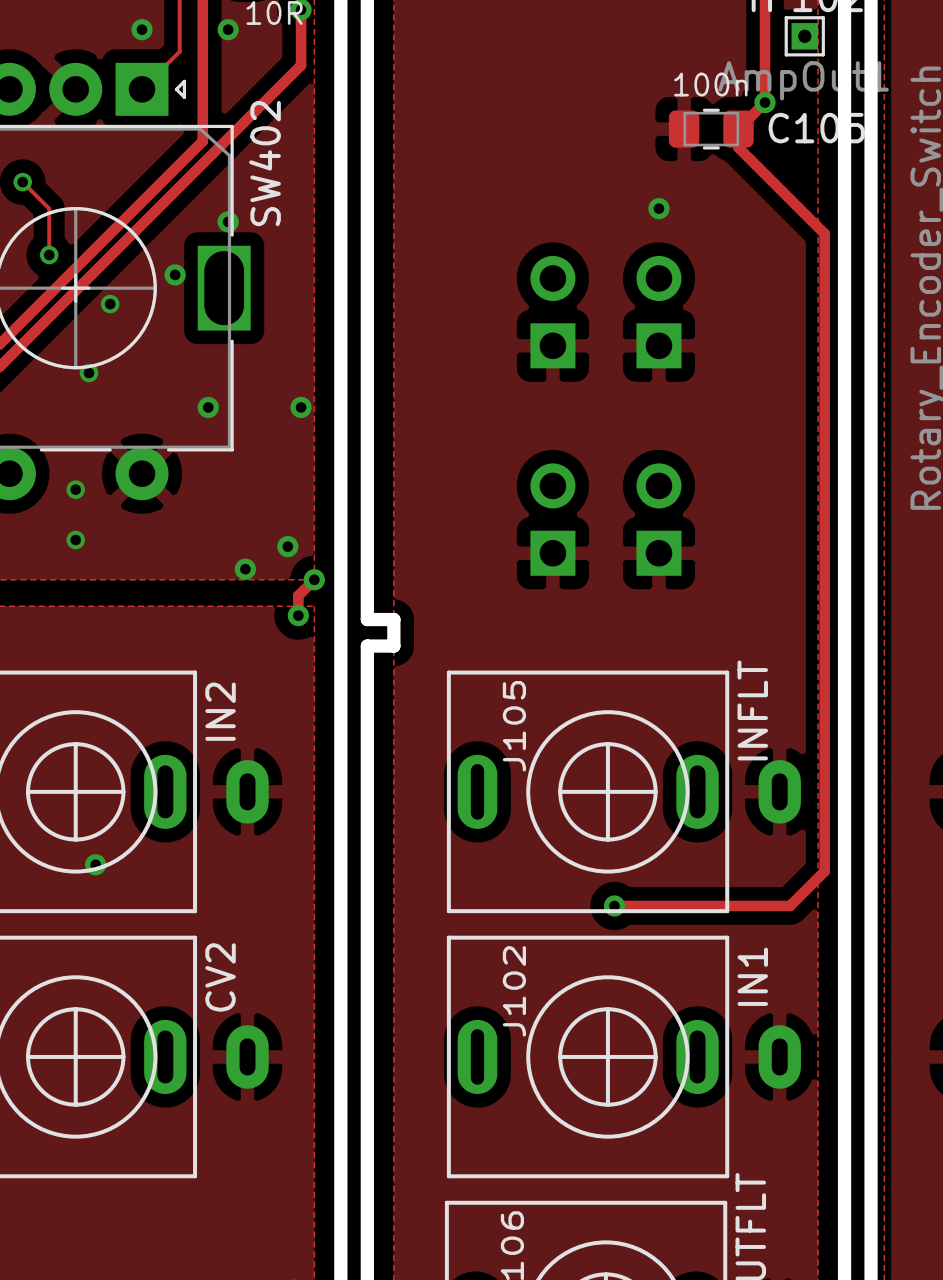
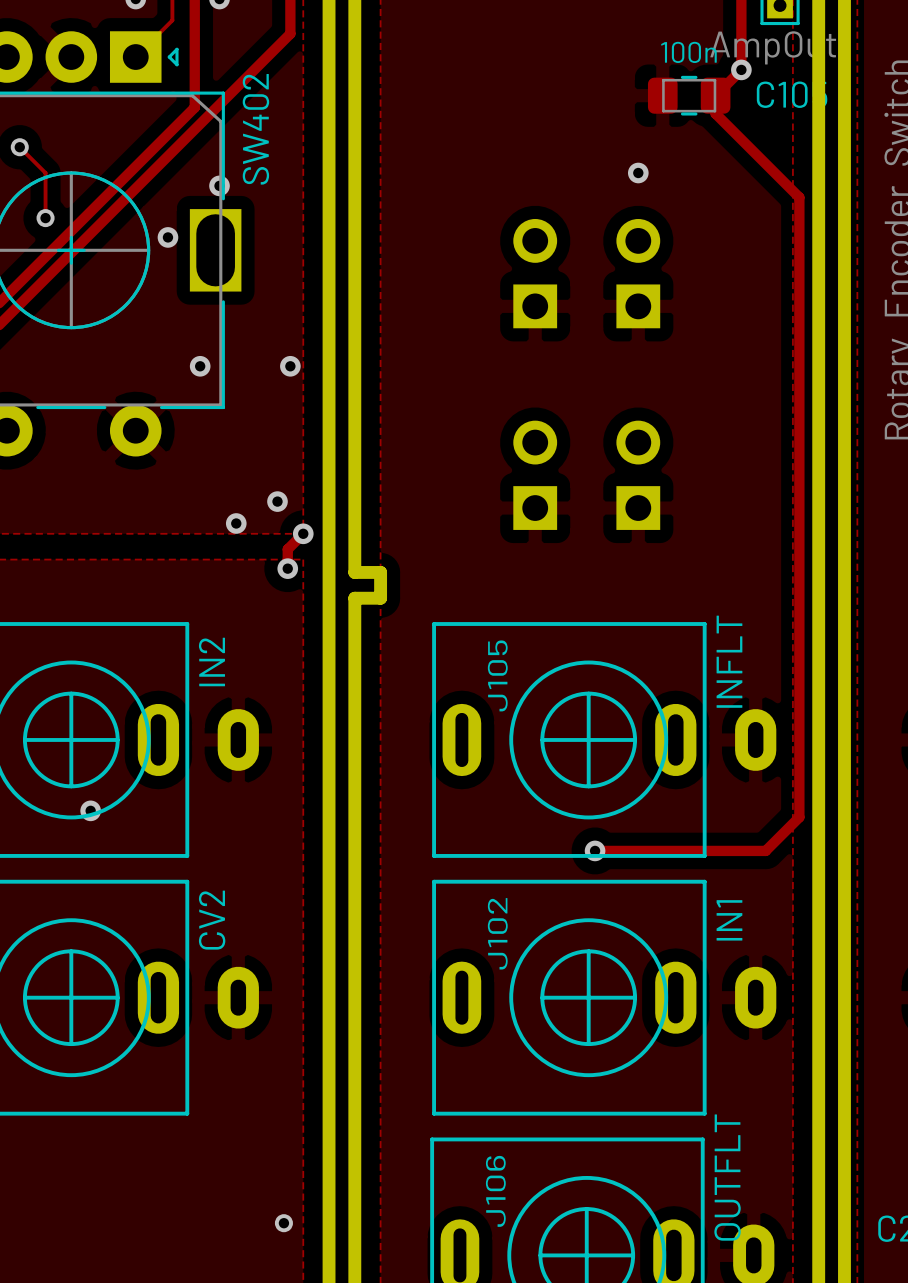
via: (110, 304) -> none
via: (88, 372) -> none
via: (75, 489) -> none
via: (75, 540) -> none

